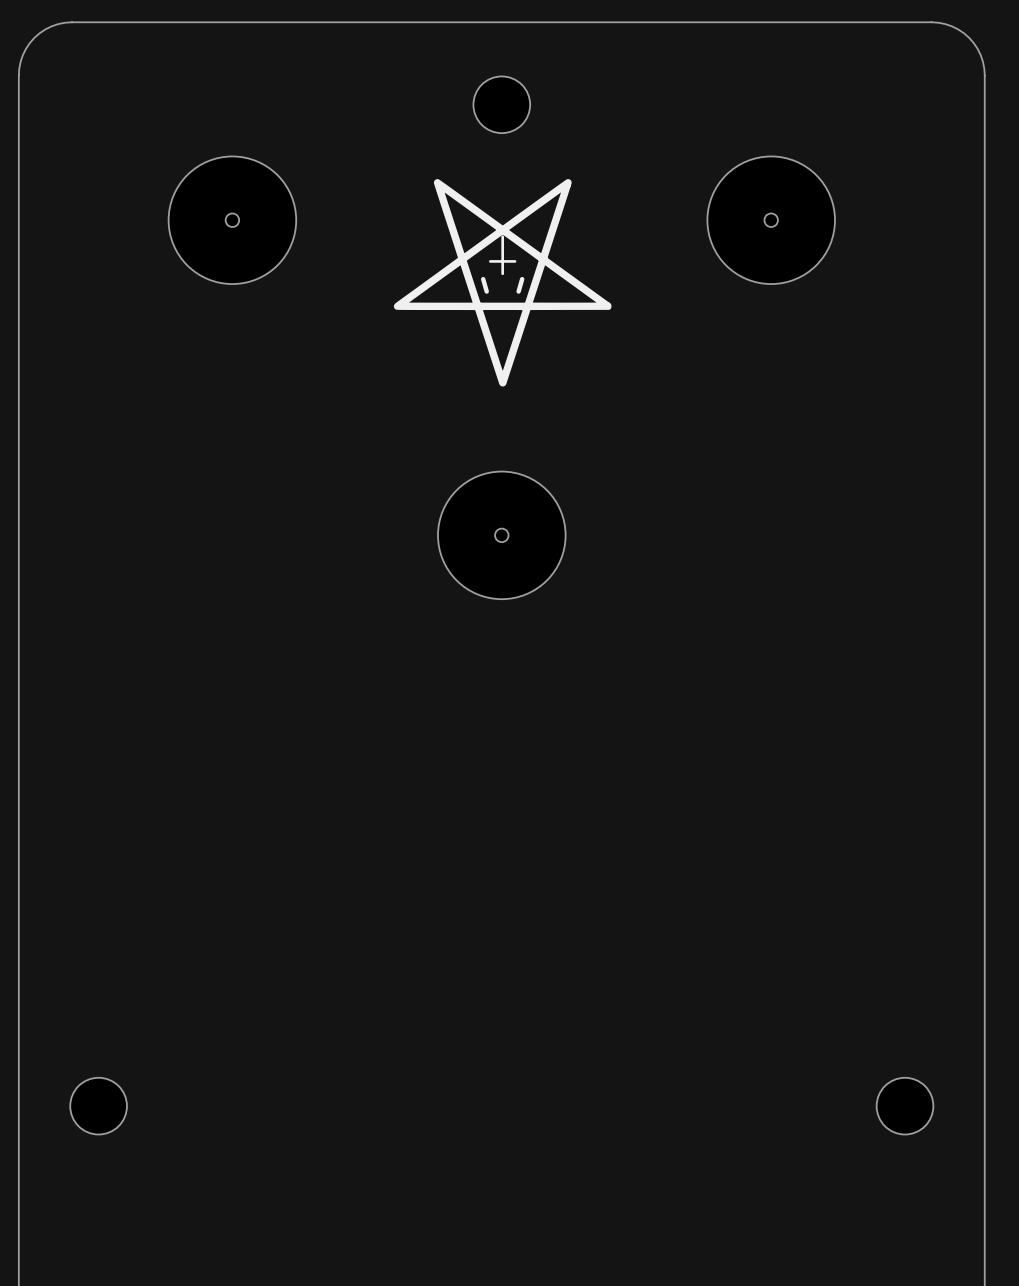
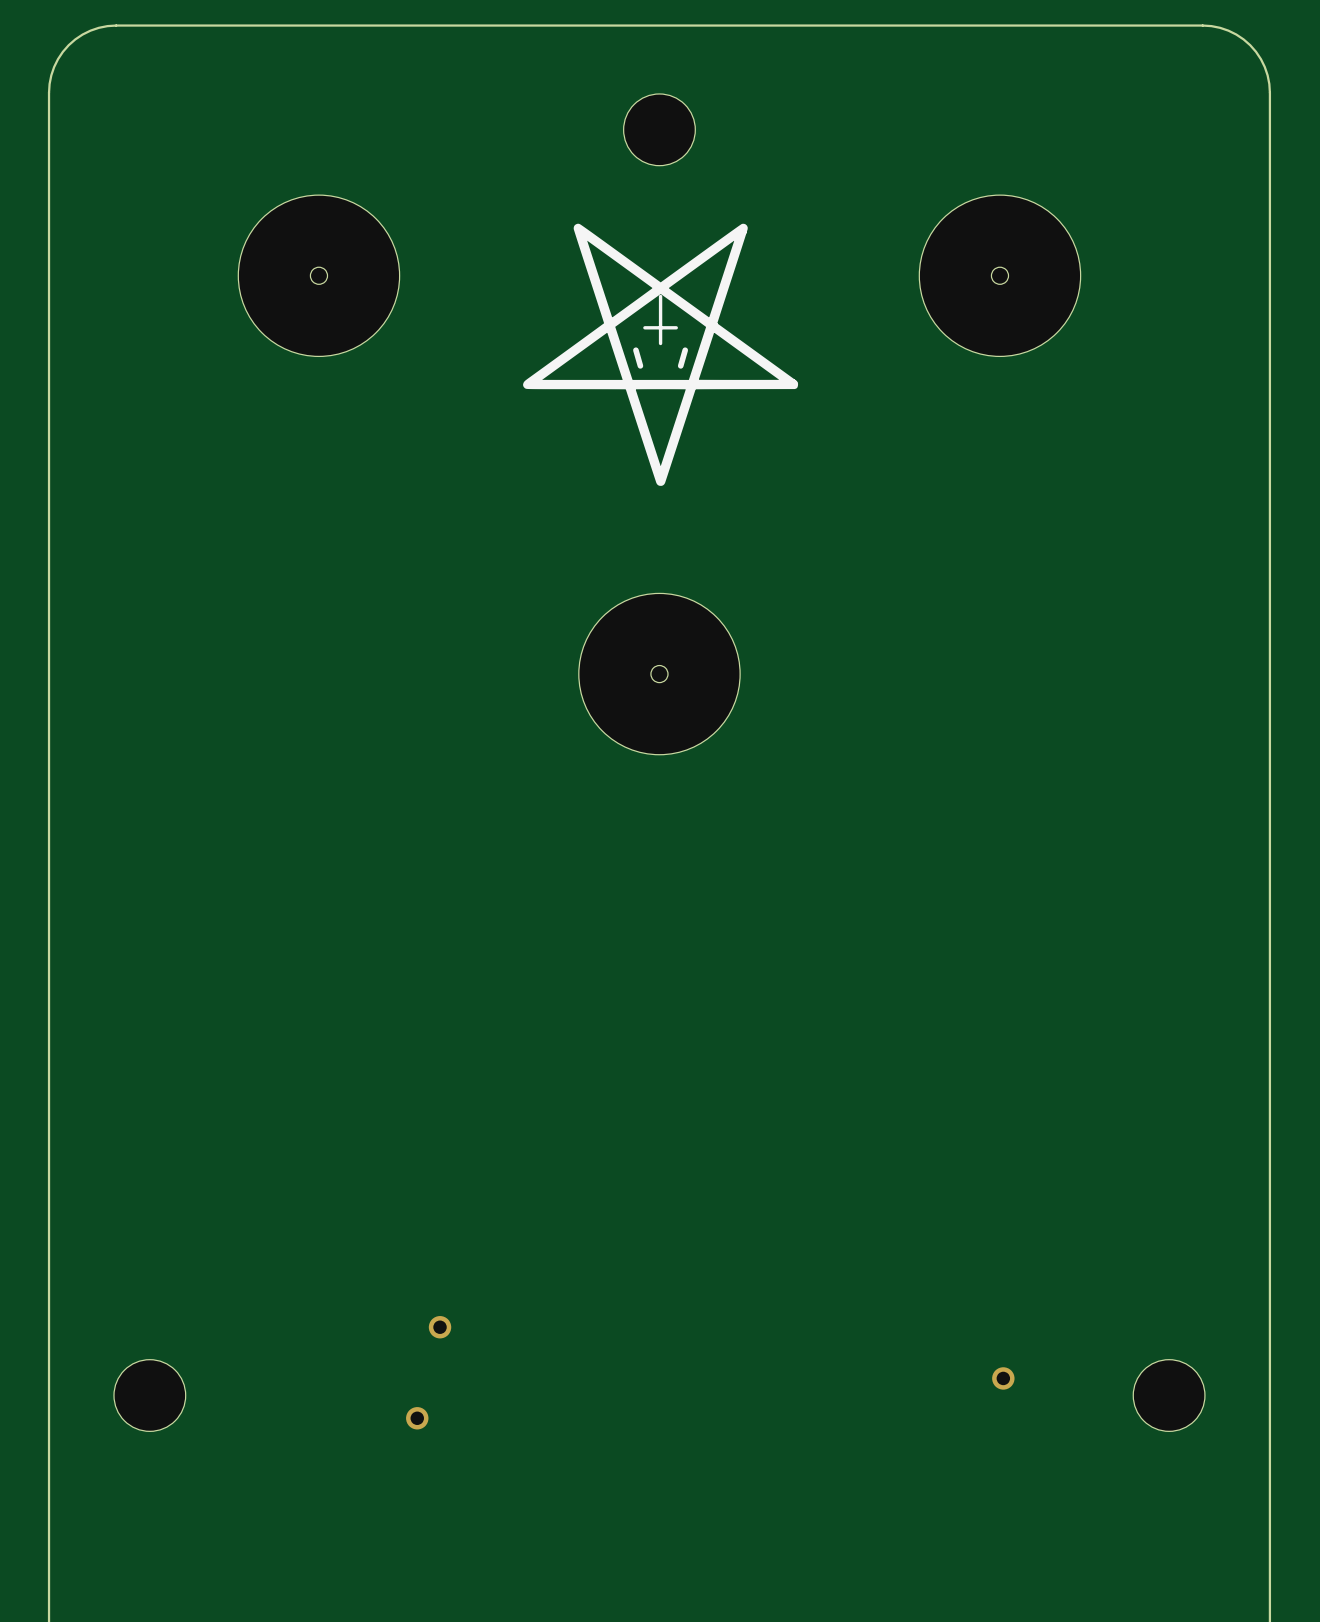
via: none -> (440, 1327)
via: none -> (1003, 1378)
via: none -> (417, 1418)

